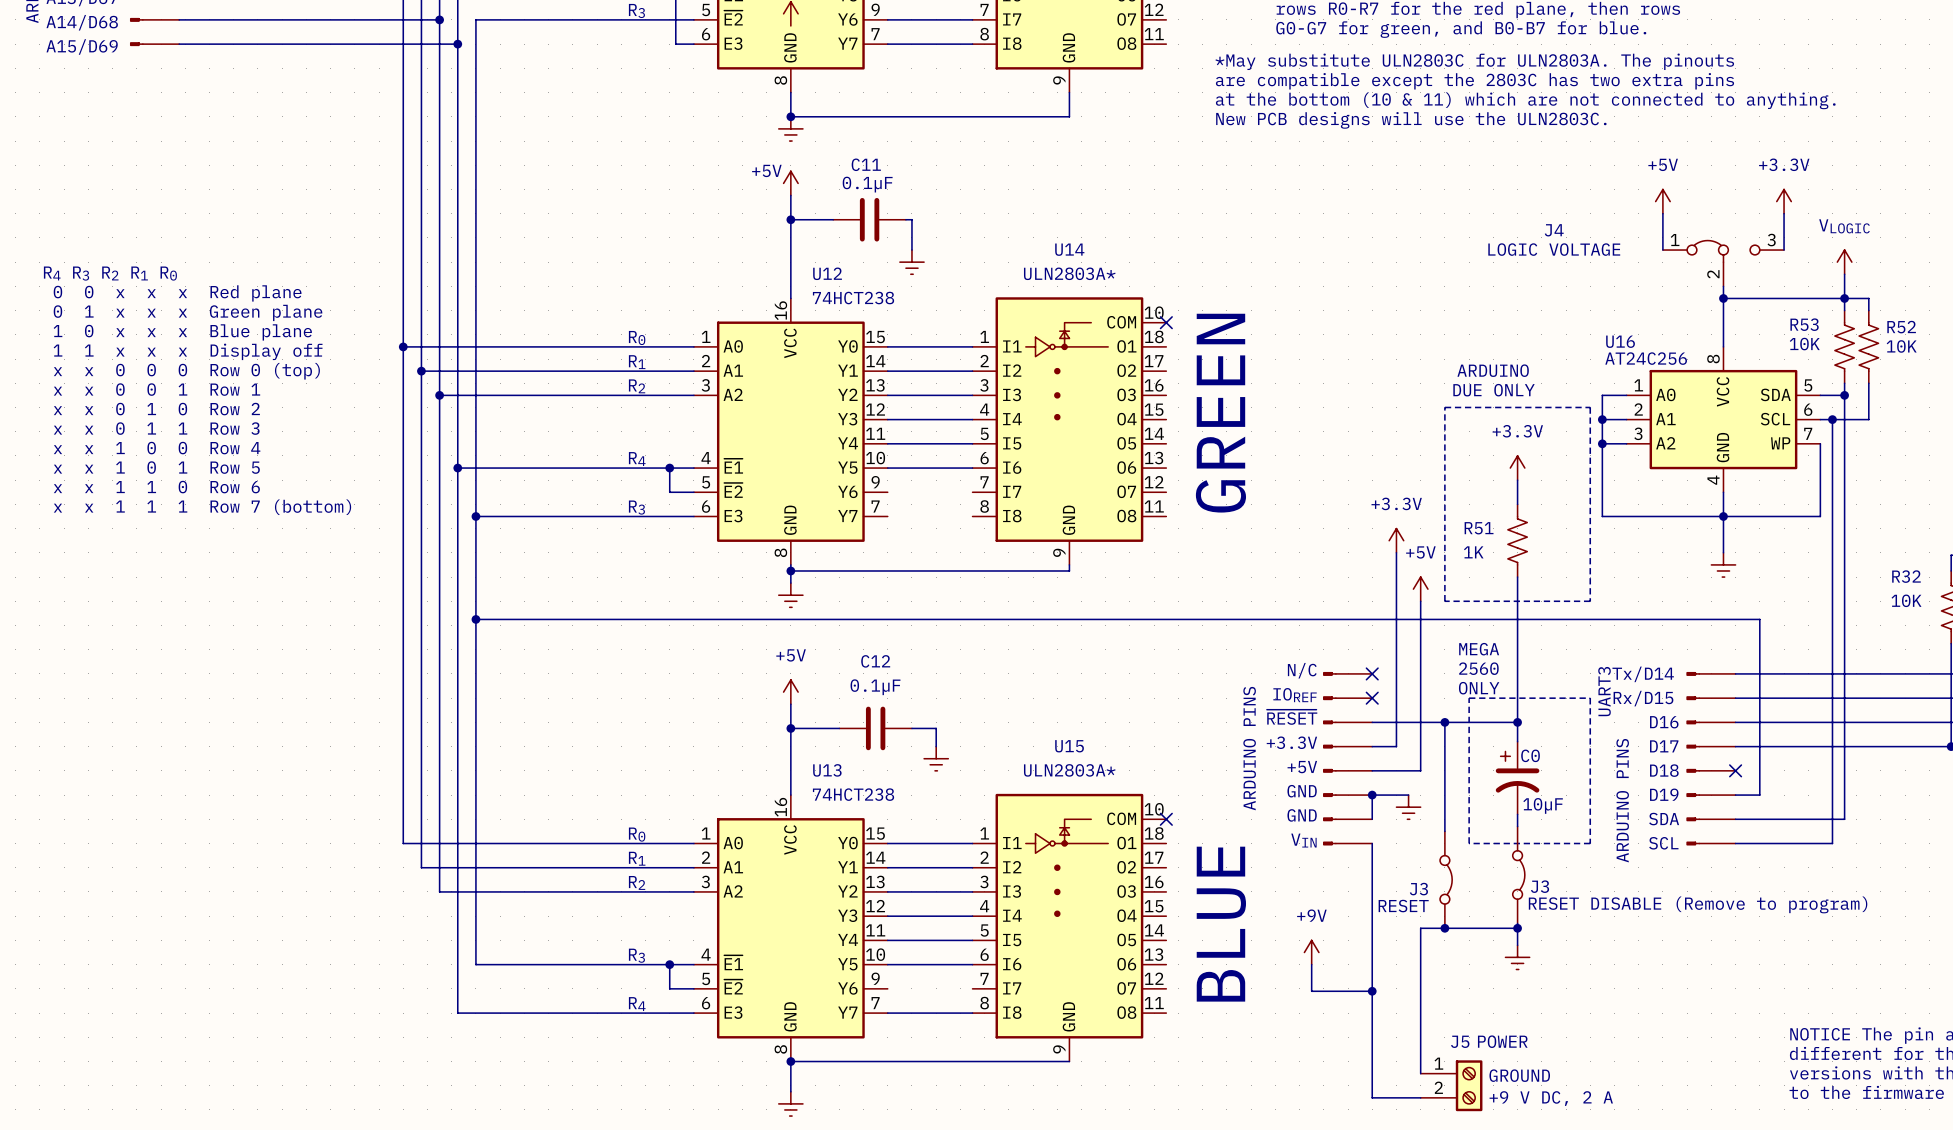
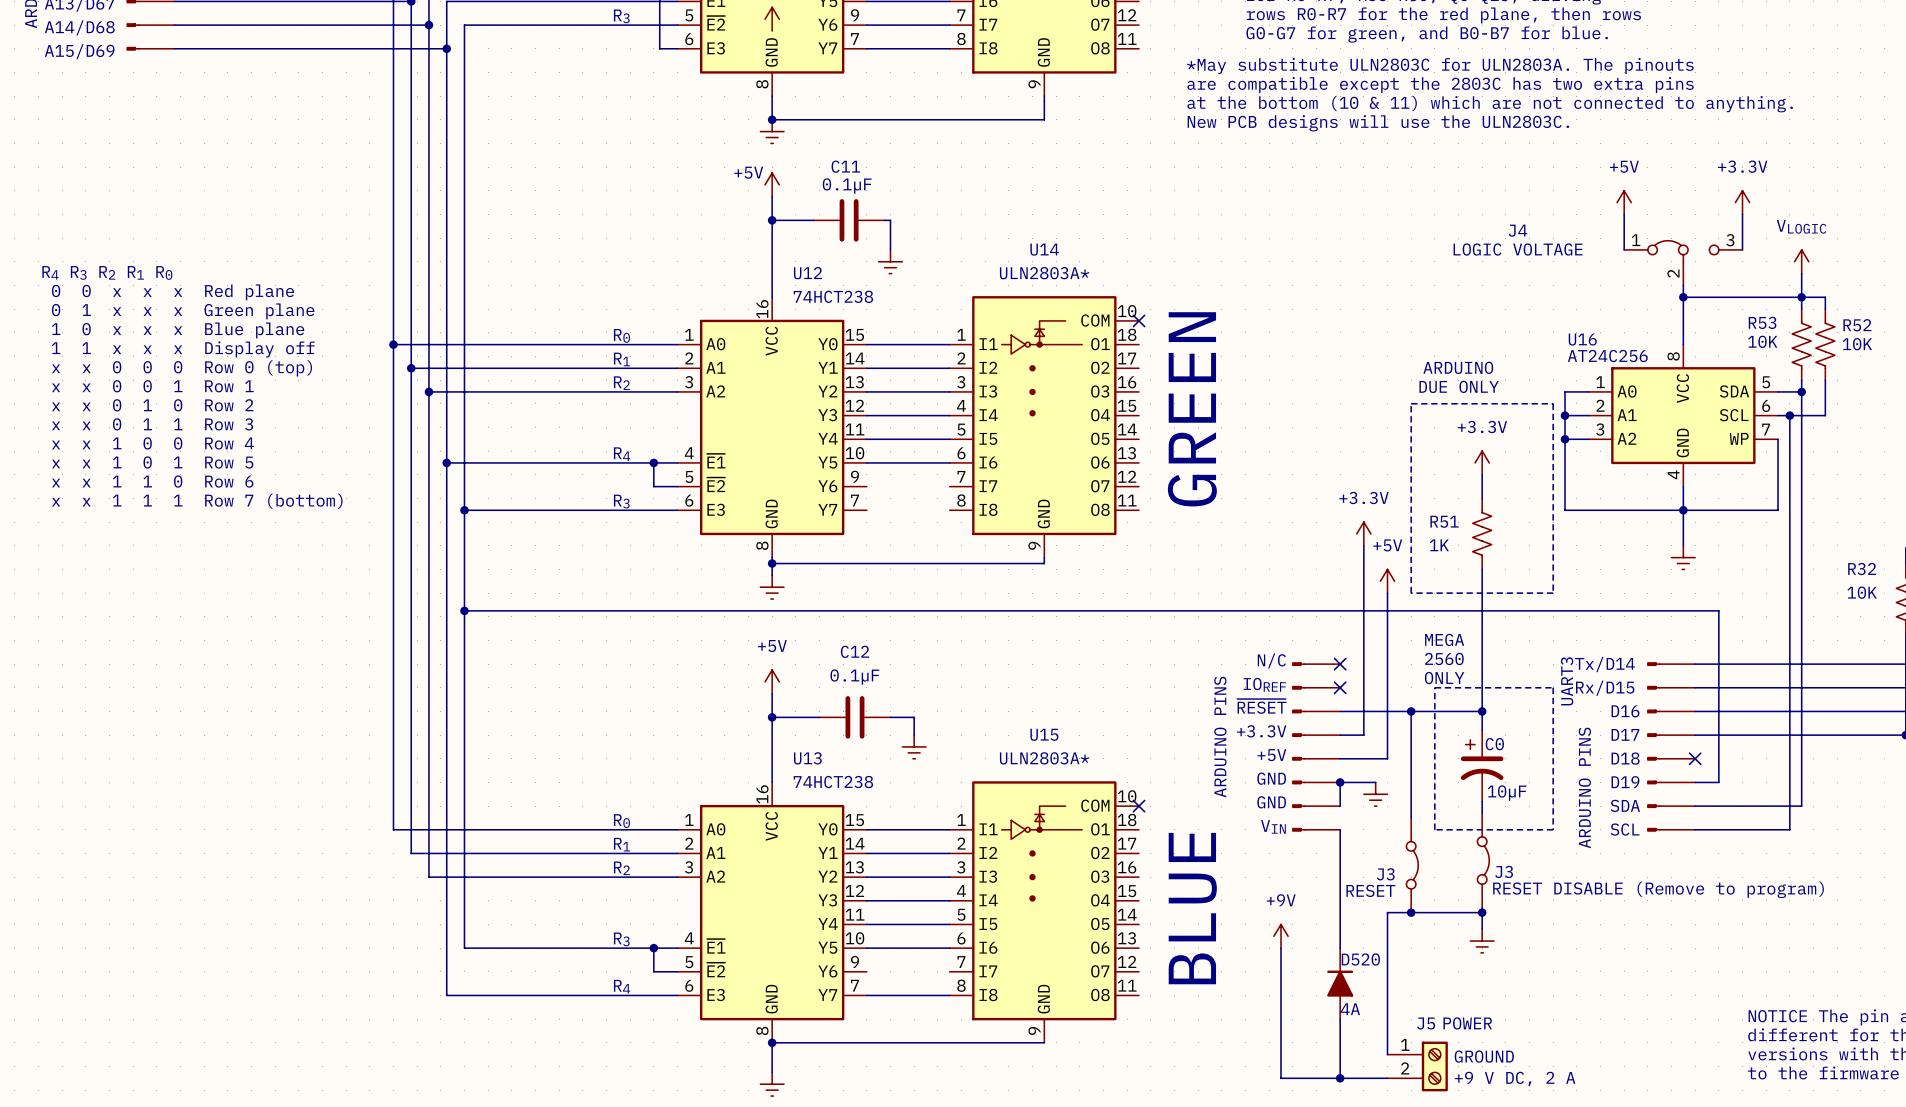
wire: (1311, 991) (1372, 991) -> (1281, 974) (1281, 1078) (1340, 1078)
junction: (1372, 991) -> none
D520: none -> 4A (1340, 983)
junction: none -> (1340, 1078)

